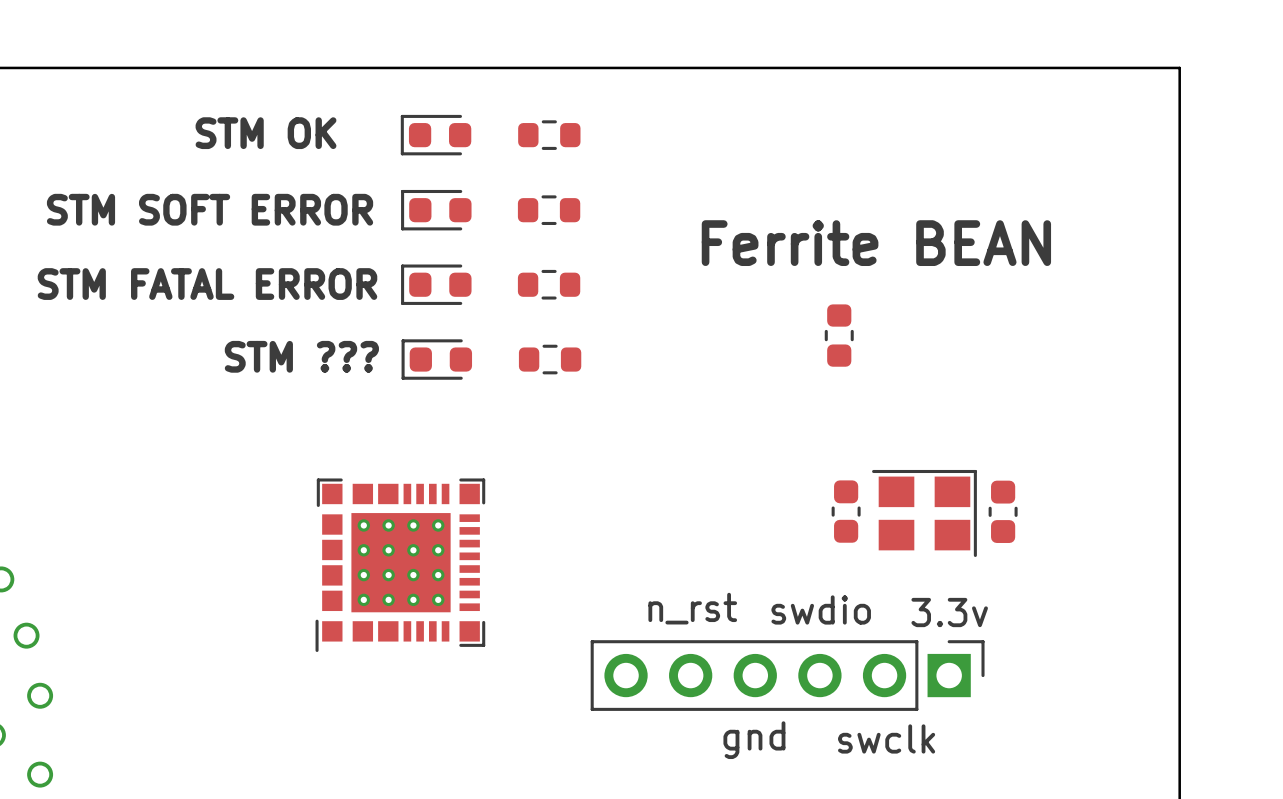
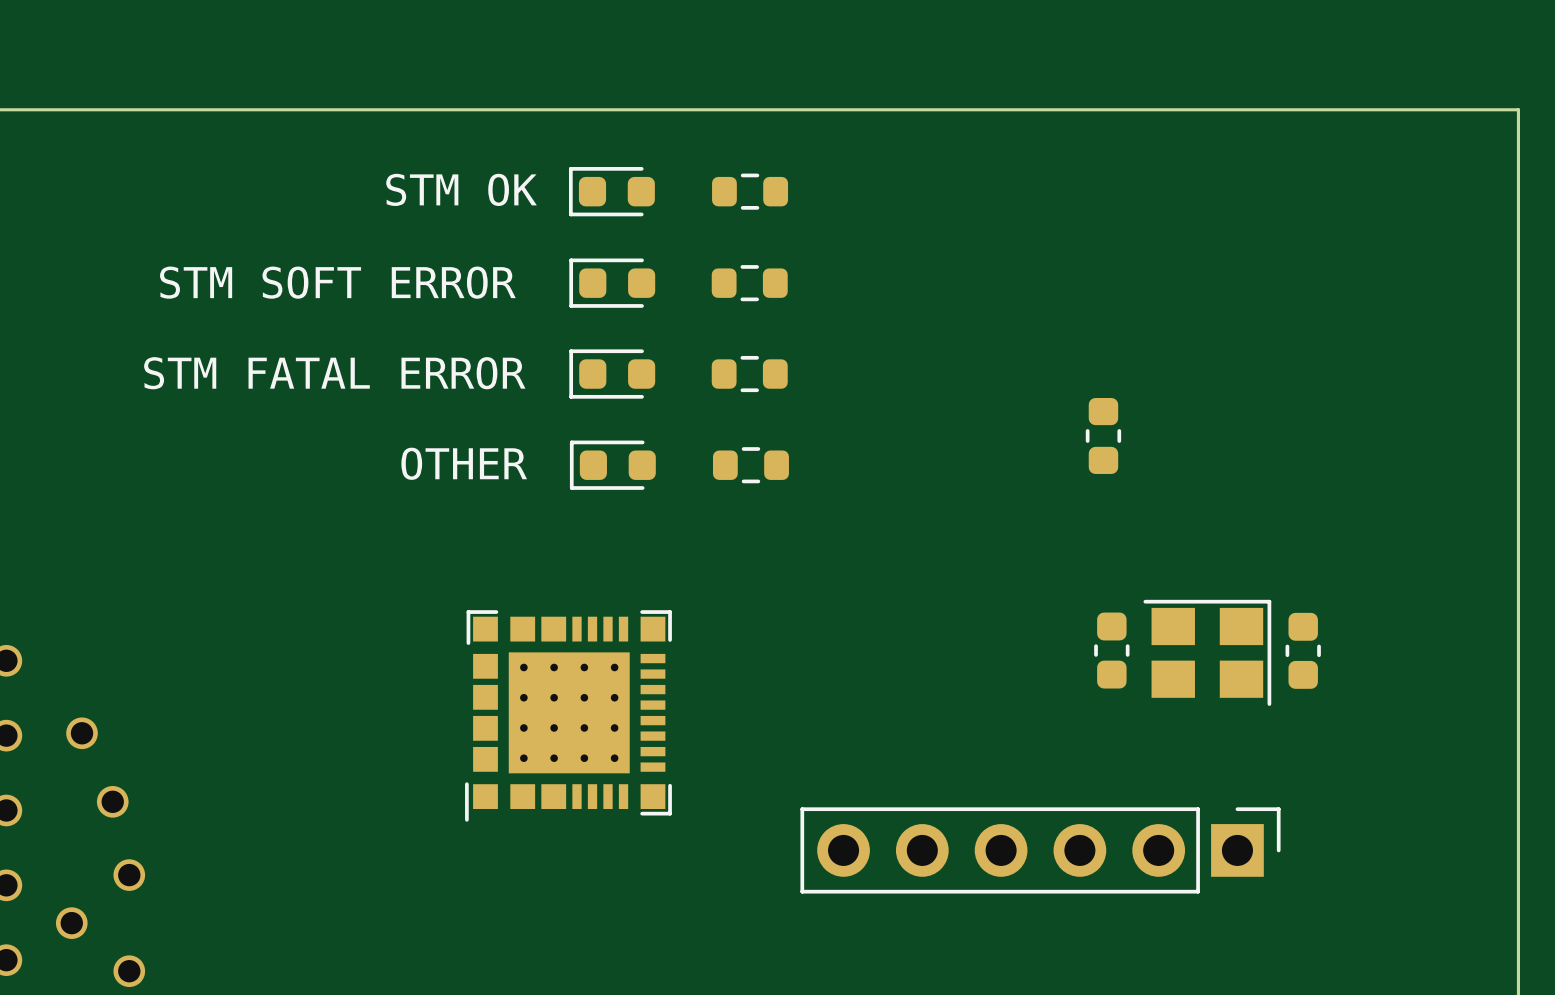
text position: STM OK (266, 133) -> STM OK (461, 189)
text: Ferrite BEAN (876, 243) -> none
text: STM ??? (301, 356) -> OTHER (464, 463)
text: n_rst (692, 608) -> none
text: swdio (821, 609) -> none
text: 3.3v (949, 612) -> none
text: swclk (886, 738) -> none
text: gnd (754, 740) -> none

